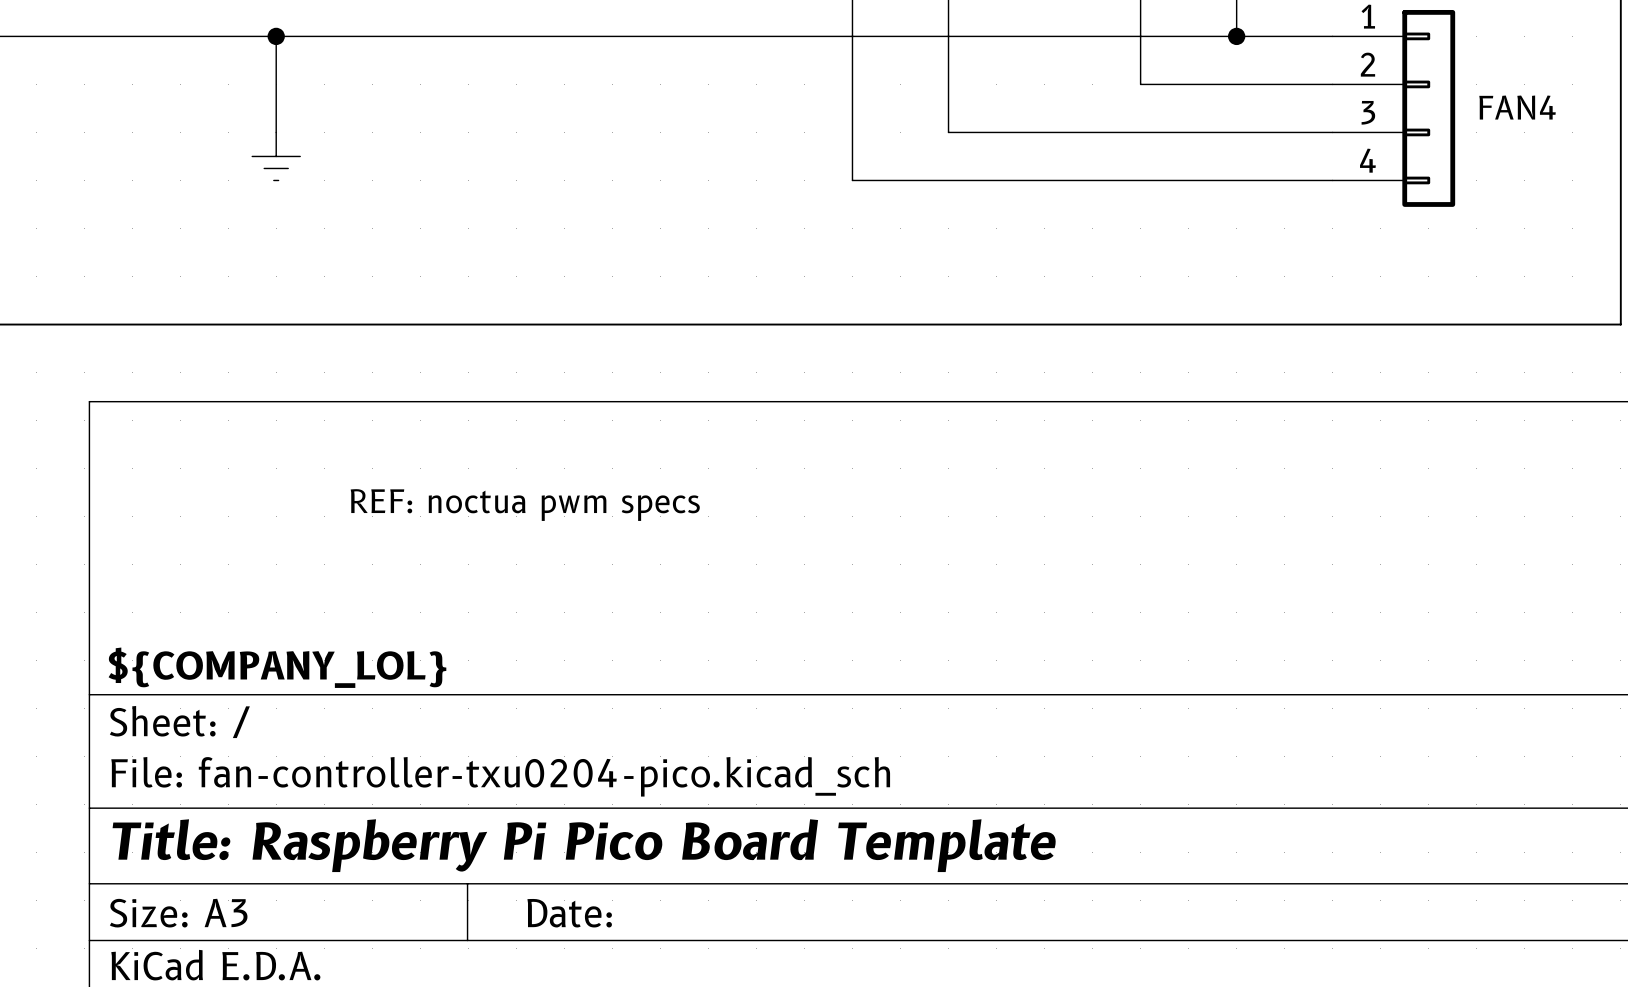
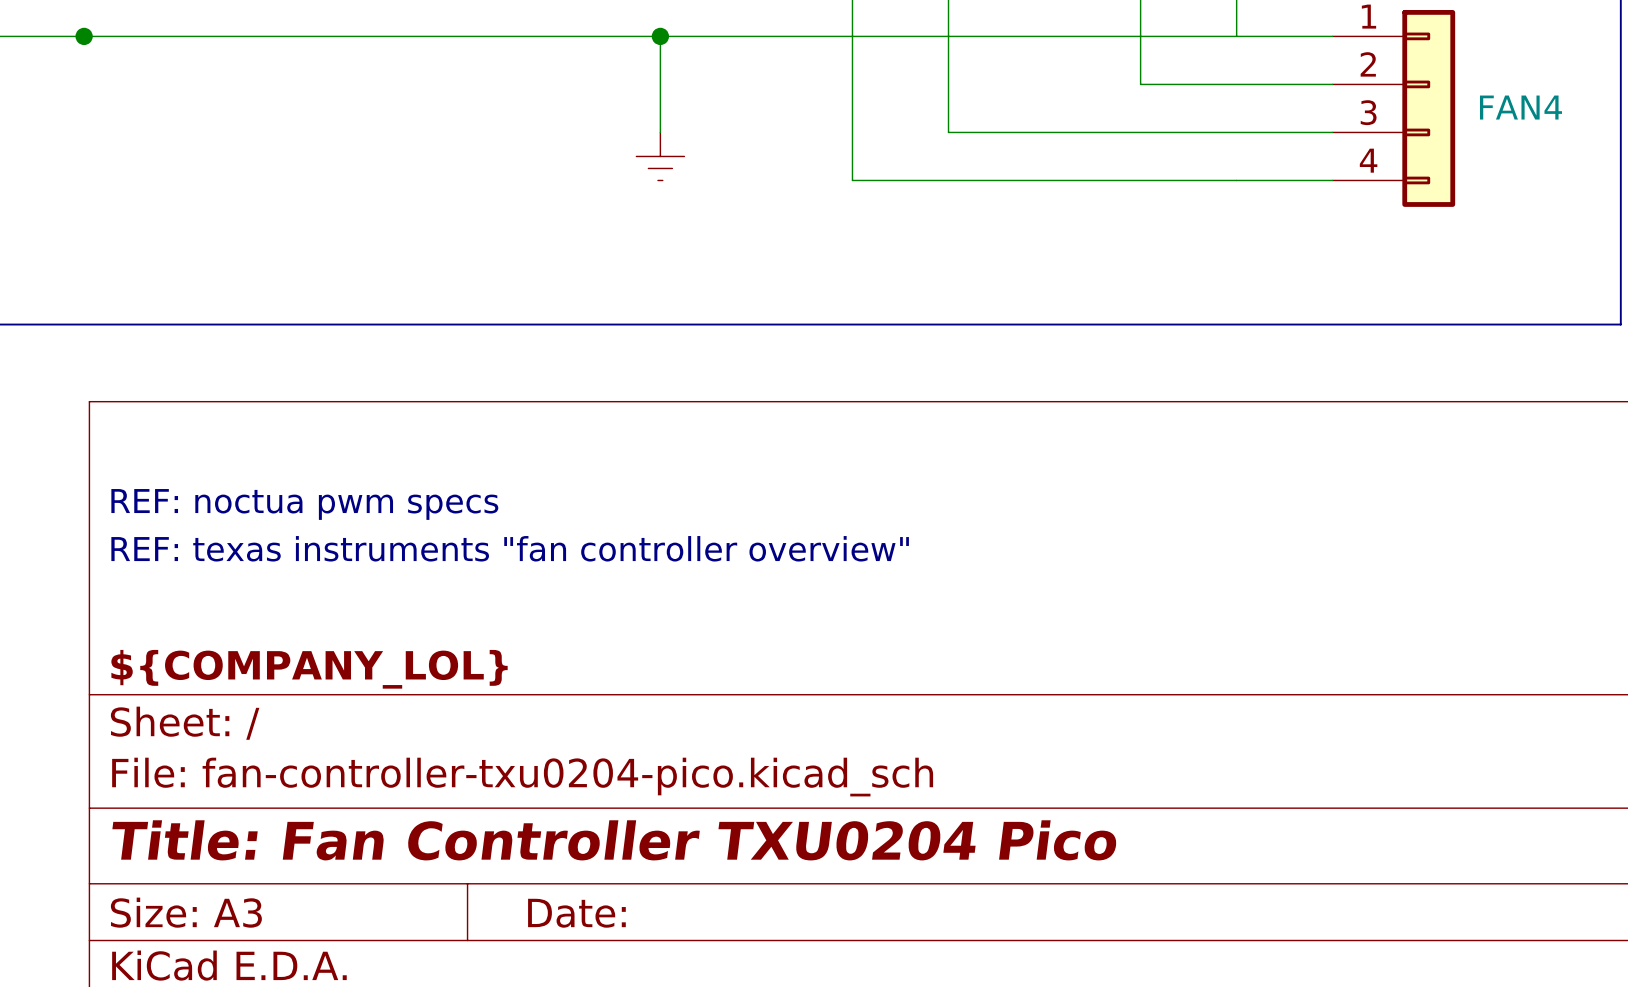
junction: none -> (84, 36)
wire: (276, 36) (276, 132) -> (660, 36) (660, 132)
junction: (276, 36) -> none
junction: none -> (660, 36)
junction: (1236, 36) -> none
power symbol position: (276, 156) -> (660, 156)
text position: REF: noctua pwm specs (525, 505) -> REF: noctua pwm specs (304, 504)
text: none -> REF: texas instruments "fan controller overview" (510, 548)
title block: Title: Raspberry Pi Pico Board Template (584, 845) -> Title: Fan Controller TXU0204 Pico (614, 840)

